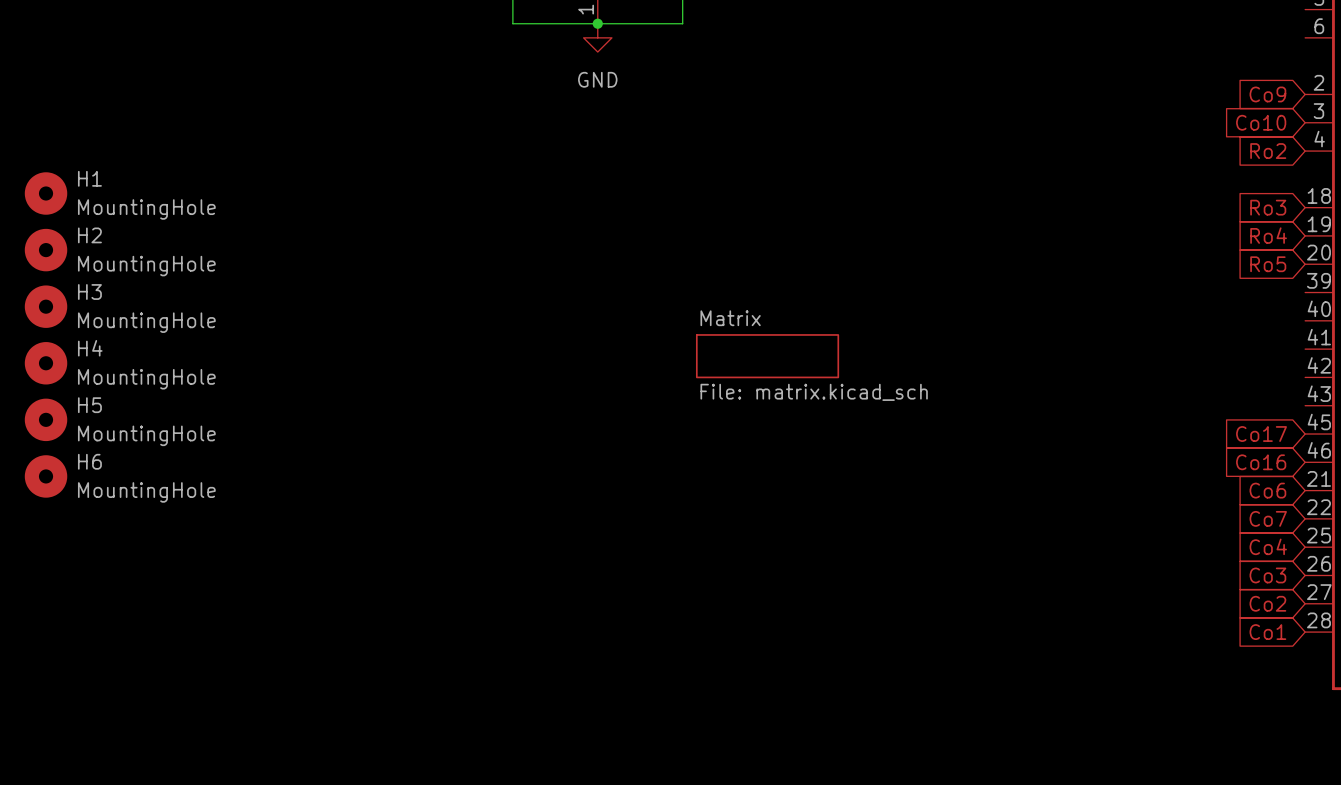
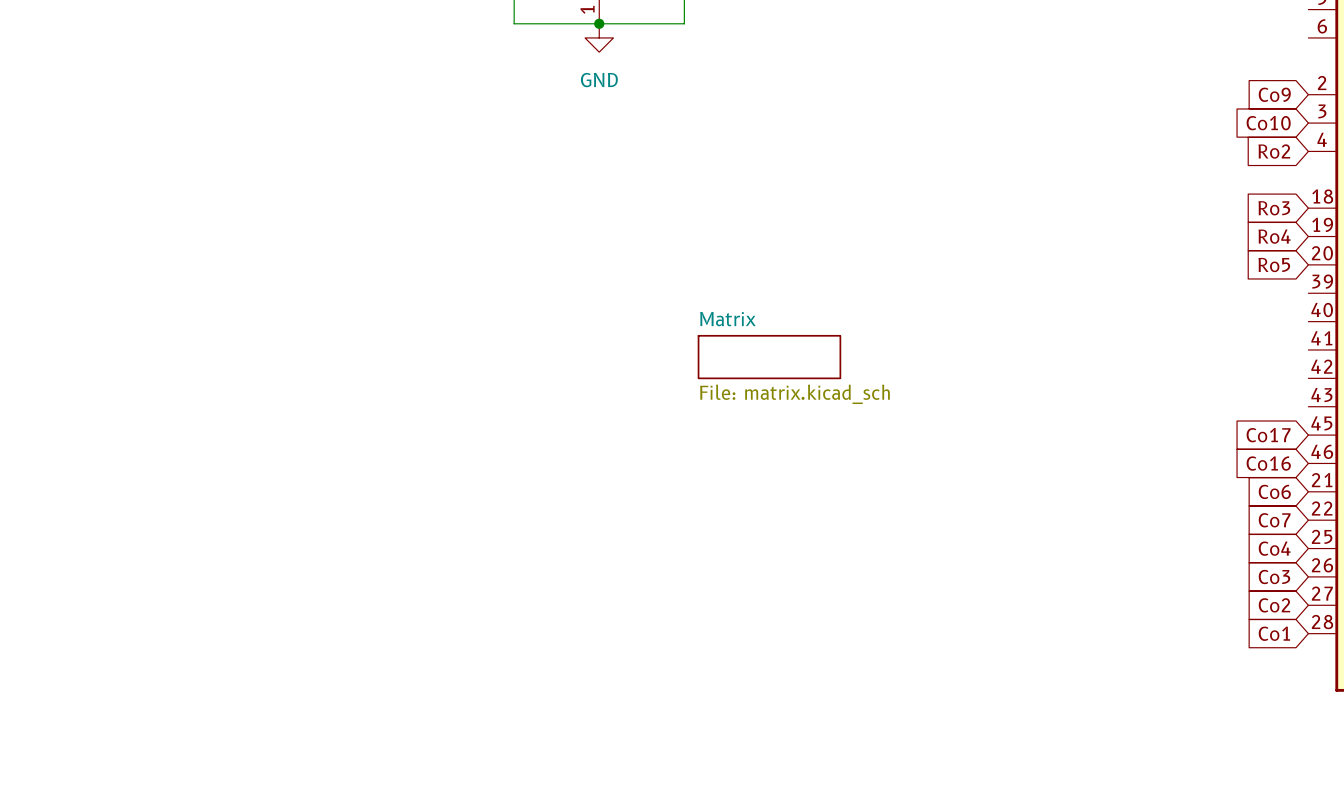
H1: MountingHole (46, 193) -> none
H2: MountingHole (46, 250) -> none
H3: MountingHole (46, 306) -> none
H4: MountingHole (46, 363) -> none
H5: MountingHole (46, 419) -> none
H6: MountingHole (46, 476) -> none

